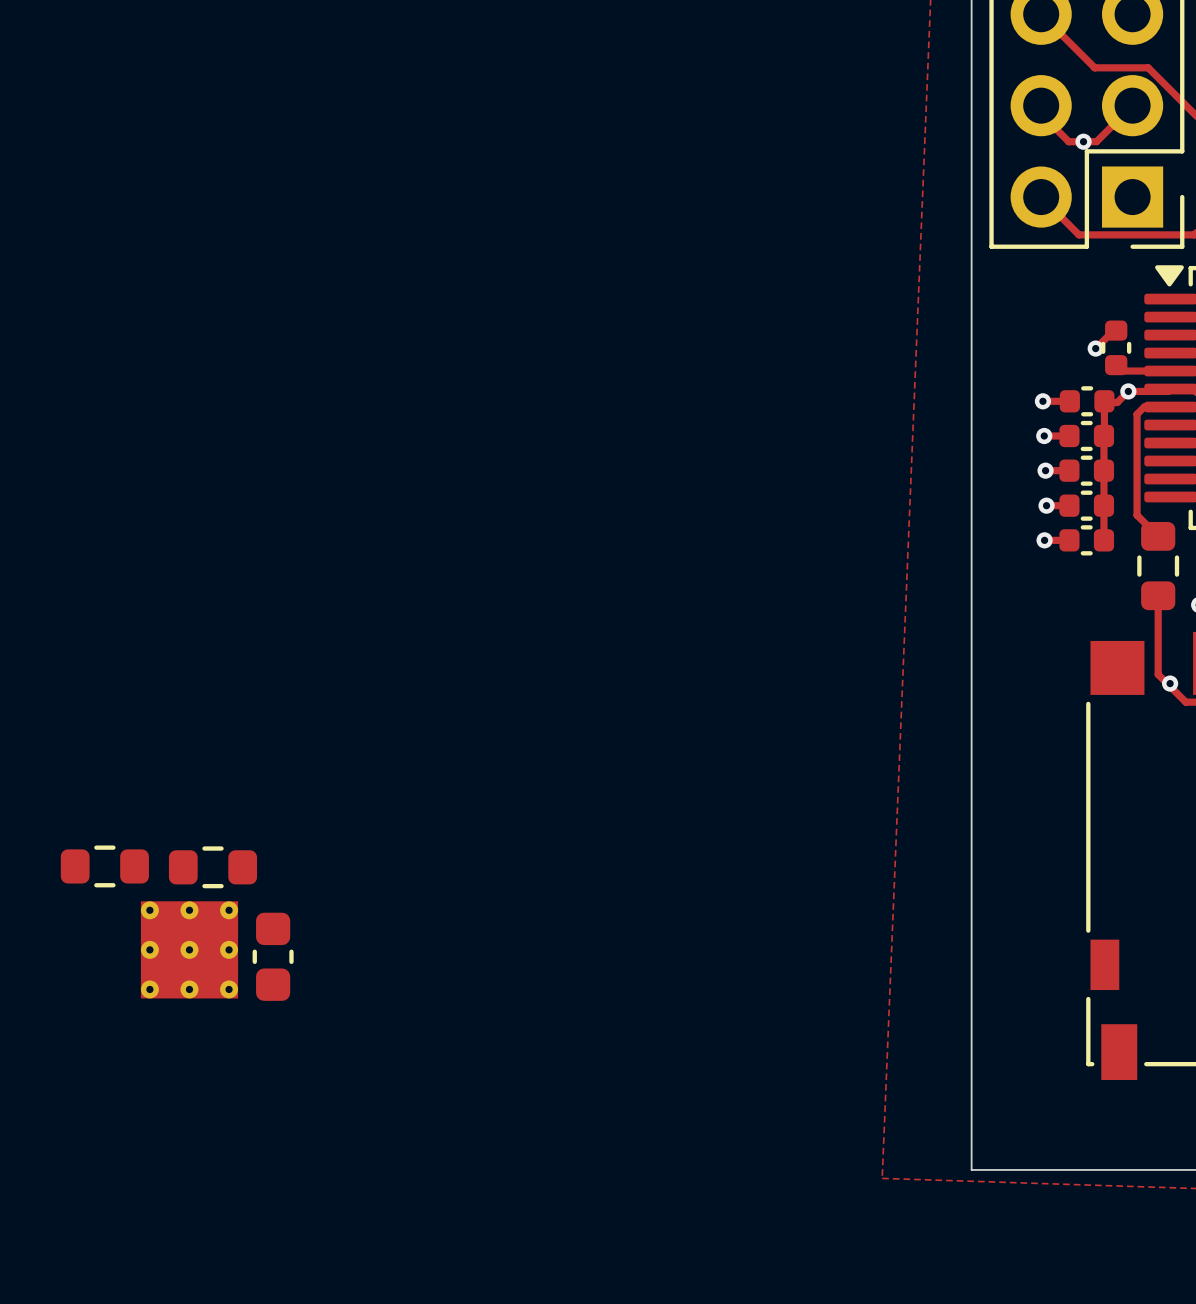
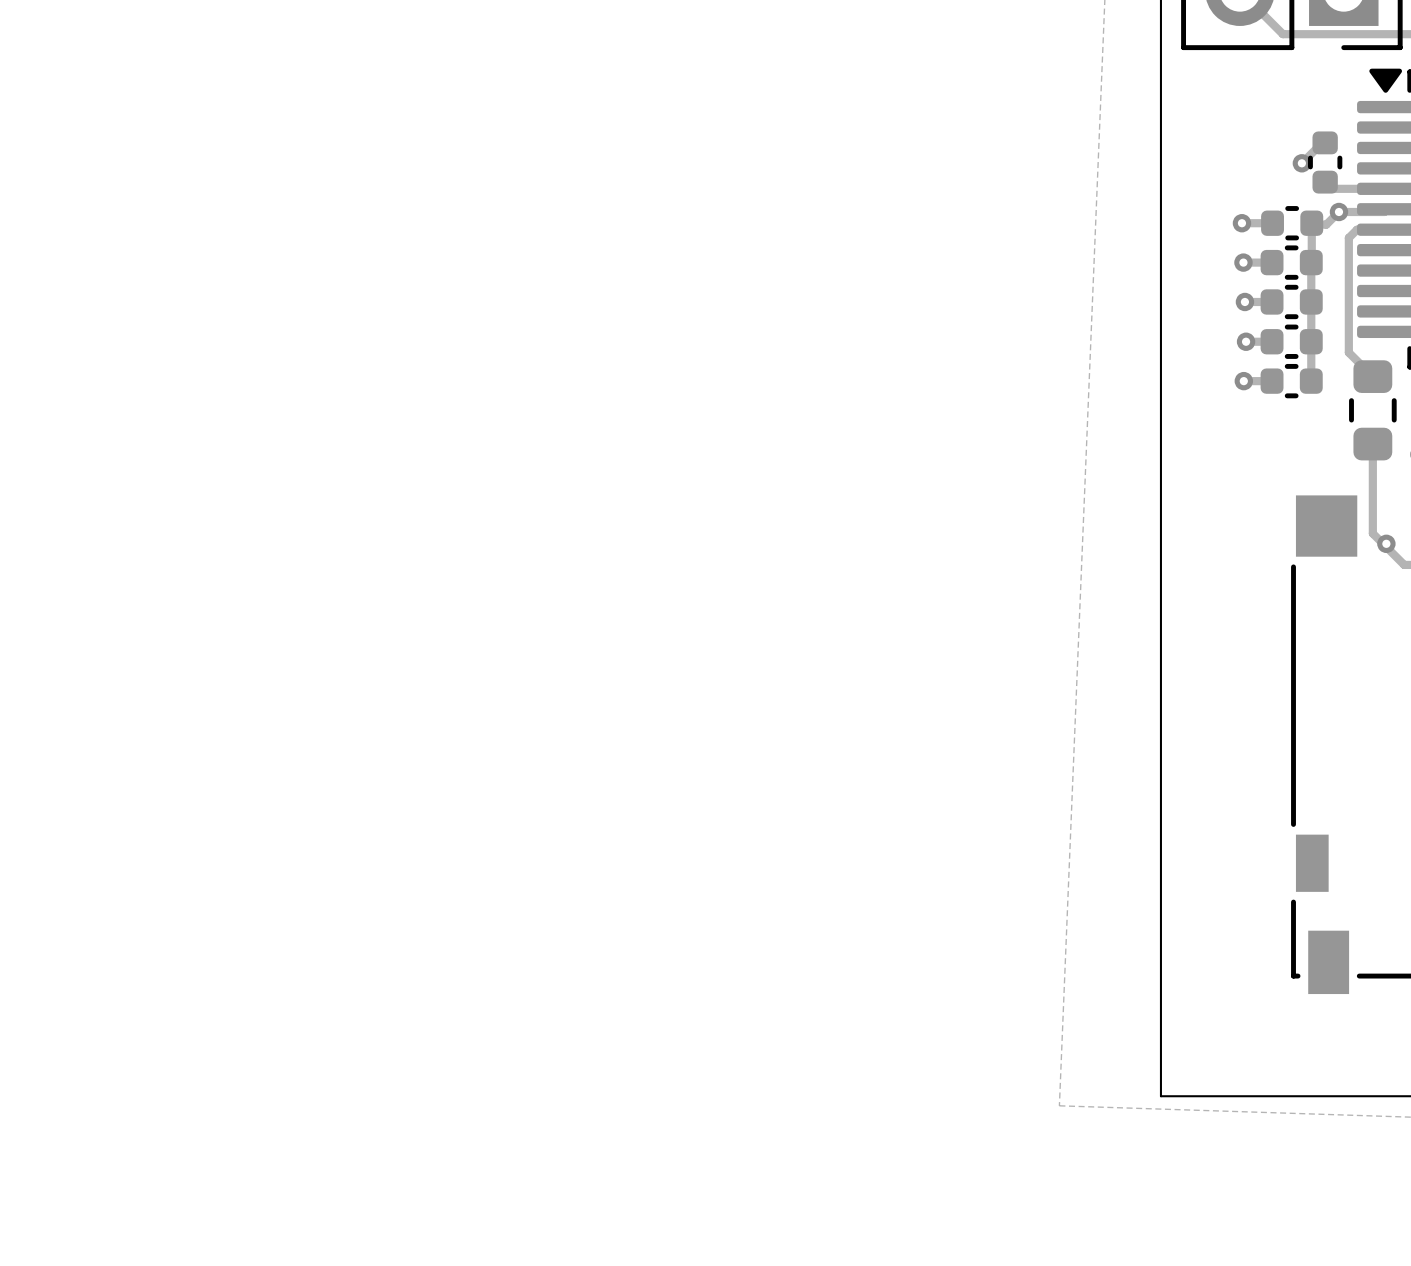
part: (104, 866) -> none
part: (212, 867) -> none
part: (189, 949) -> none
part: (273, 956) -> none

